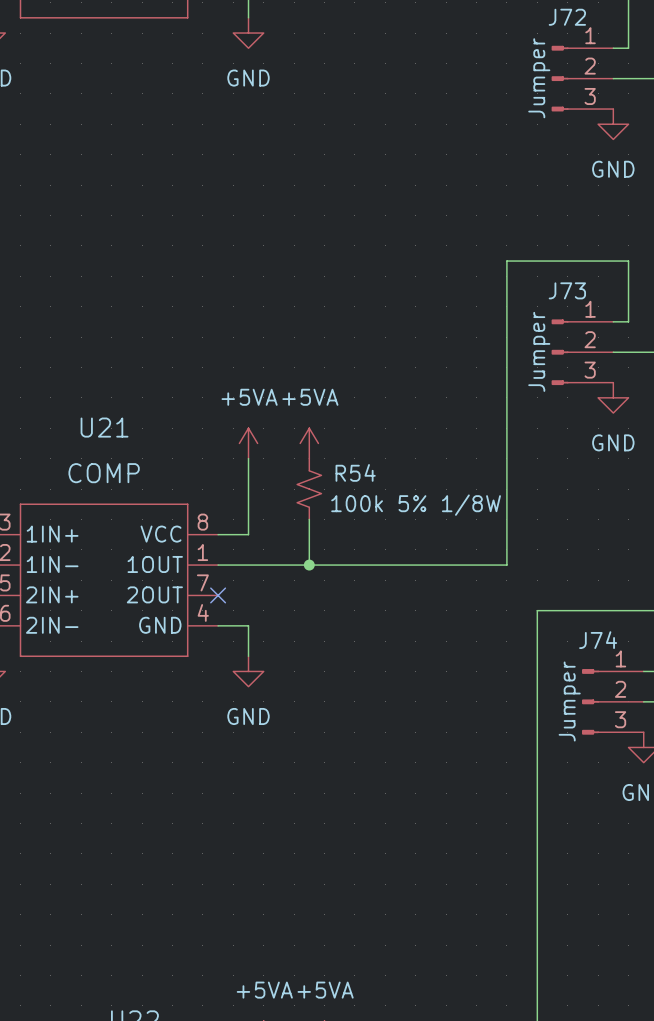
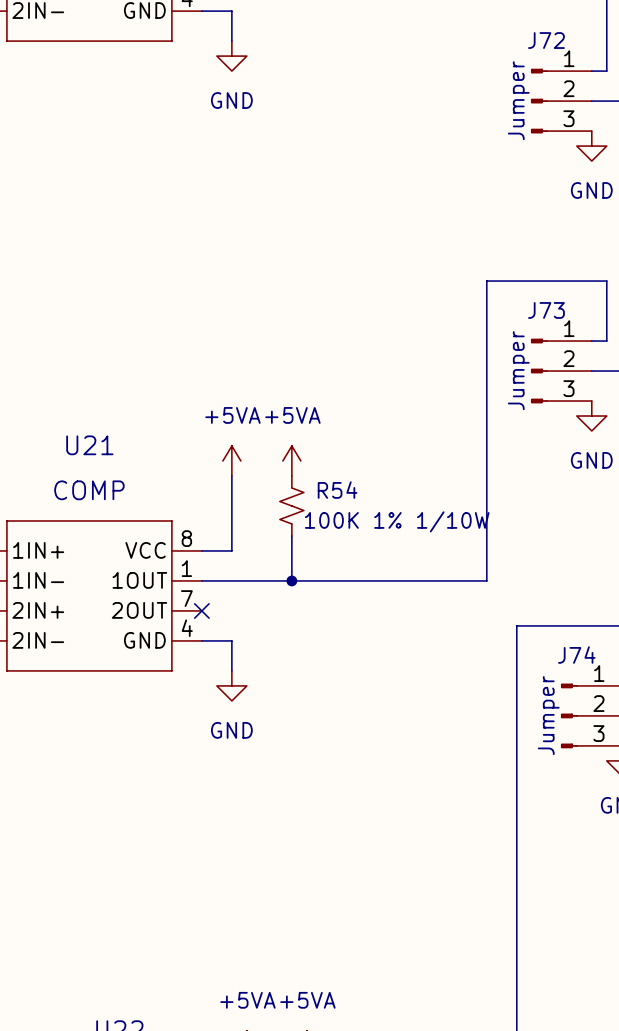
R54 value: 100k 5% 1/8W (416, 505) -> 100K 1% 1/10W (397, 521)

